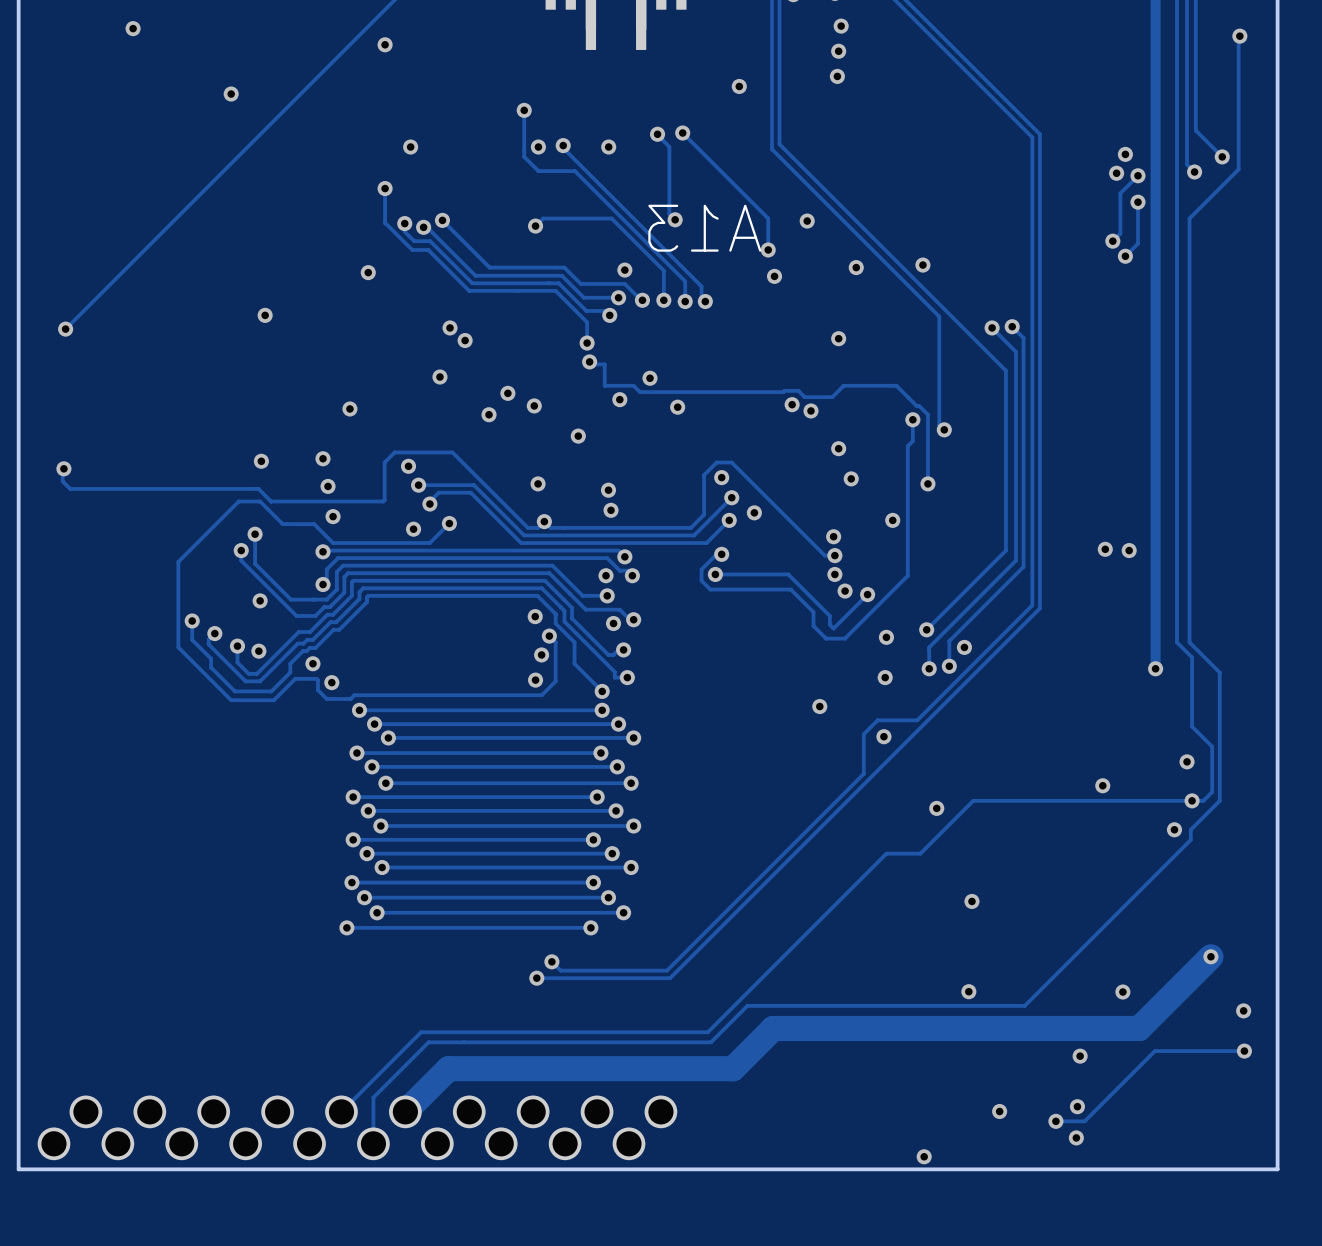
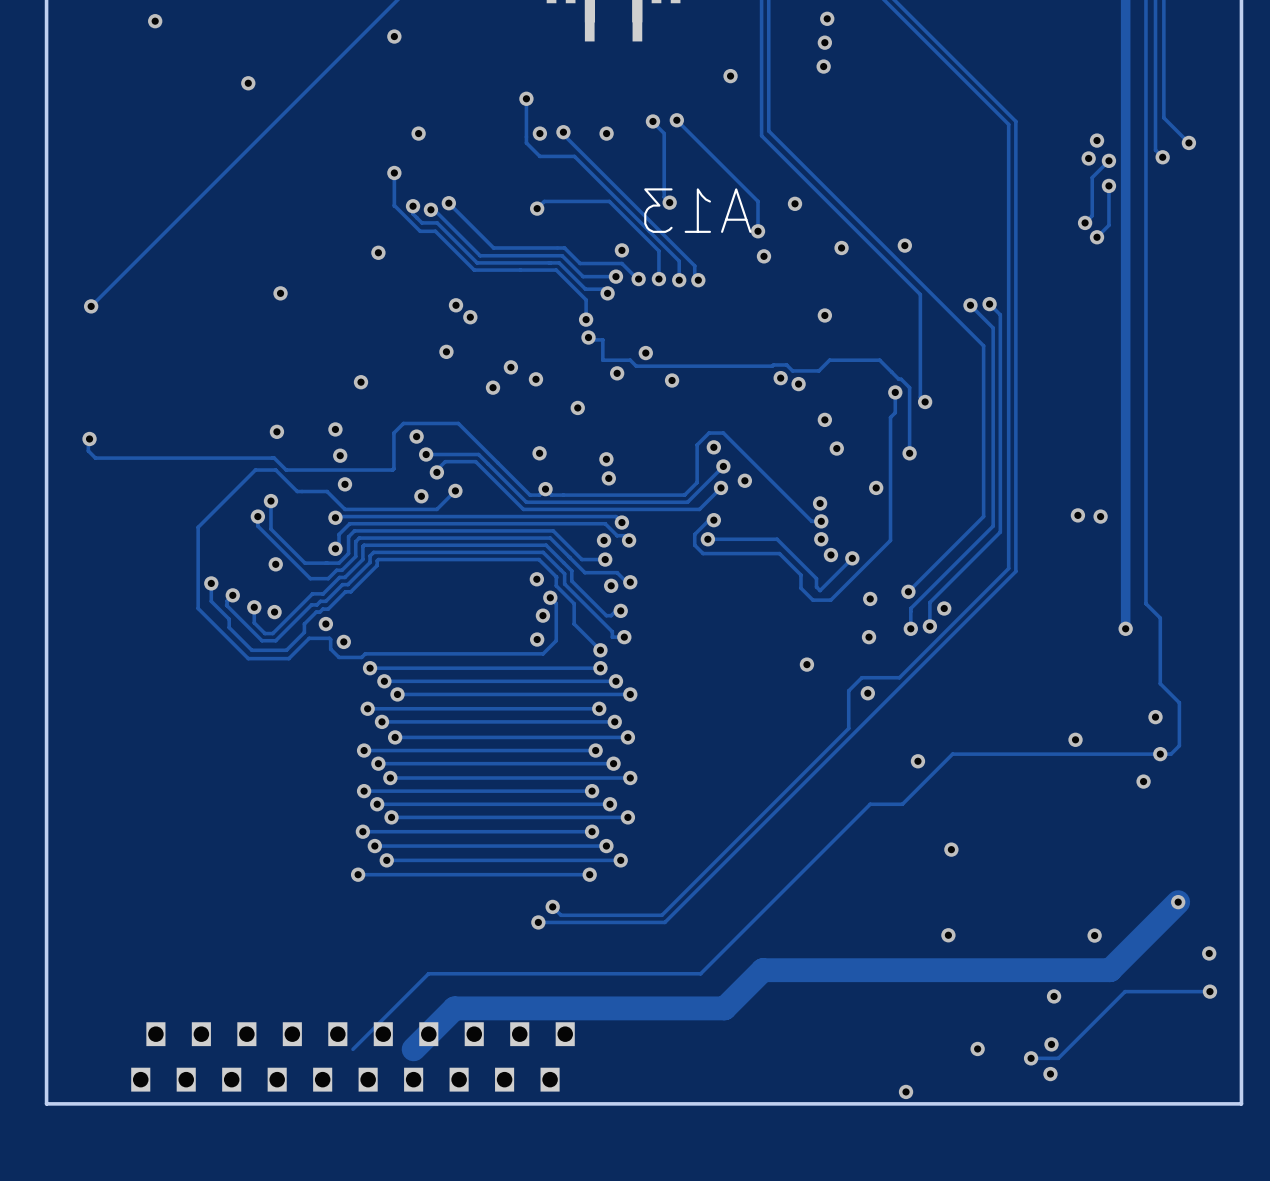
track: (1239, 36) (1238, 169) (1189, 218) (1189, 642) (1219, 672) (1219, 800) (1190, 829) (1190, 839) (1024, 1005) (747, 1005) (711, 1042) (428, 1042) (373, 1097) (373, 1143) -> none
via: (1239, 36) -> none
part footprint: [37, 1095, 678, 1161] -> [131, 1022, 575, 1092]

